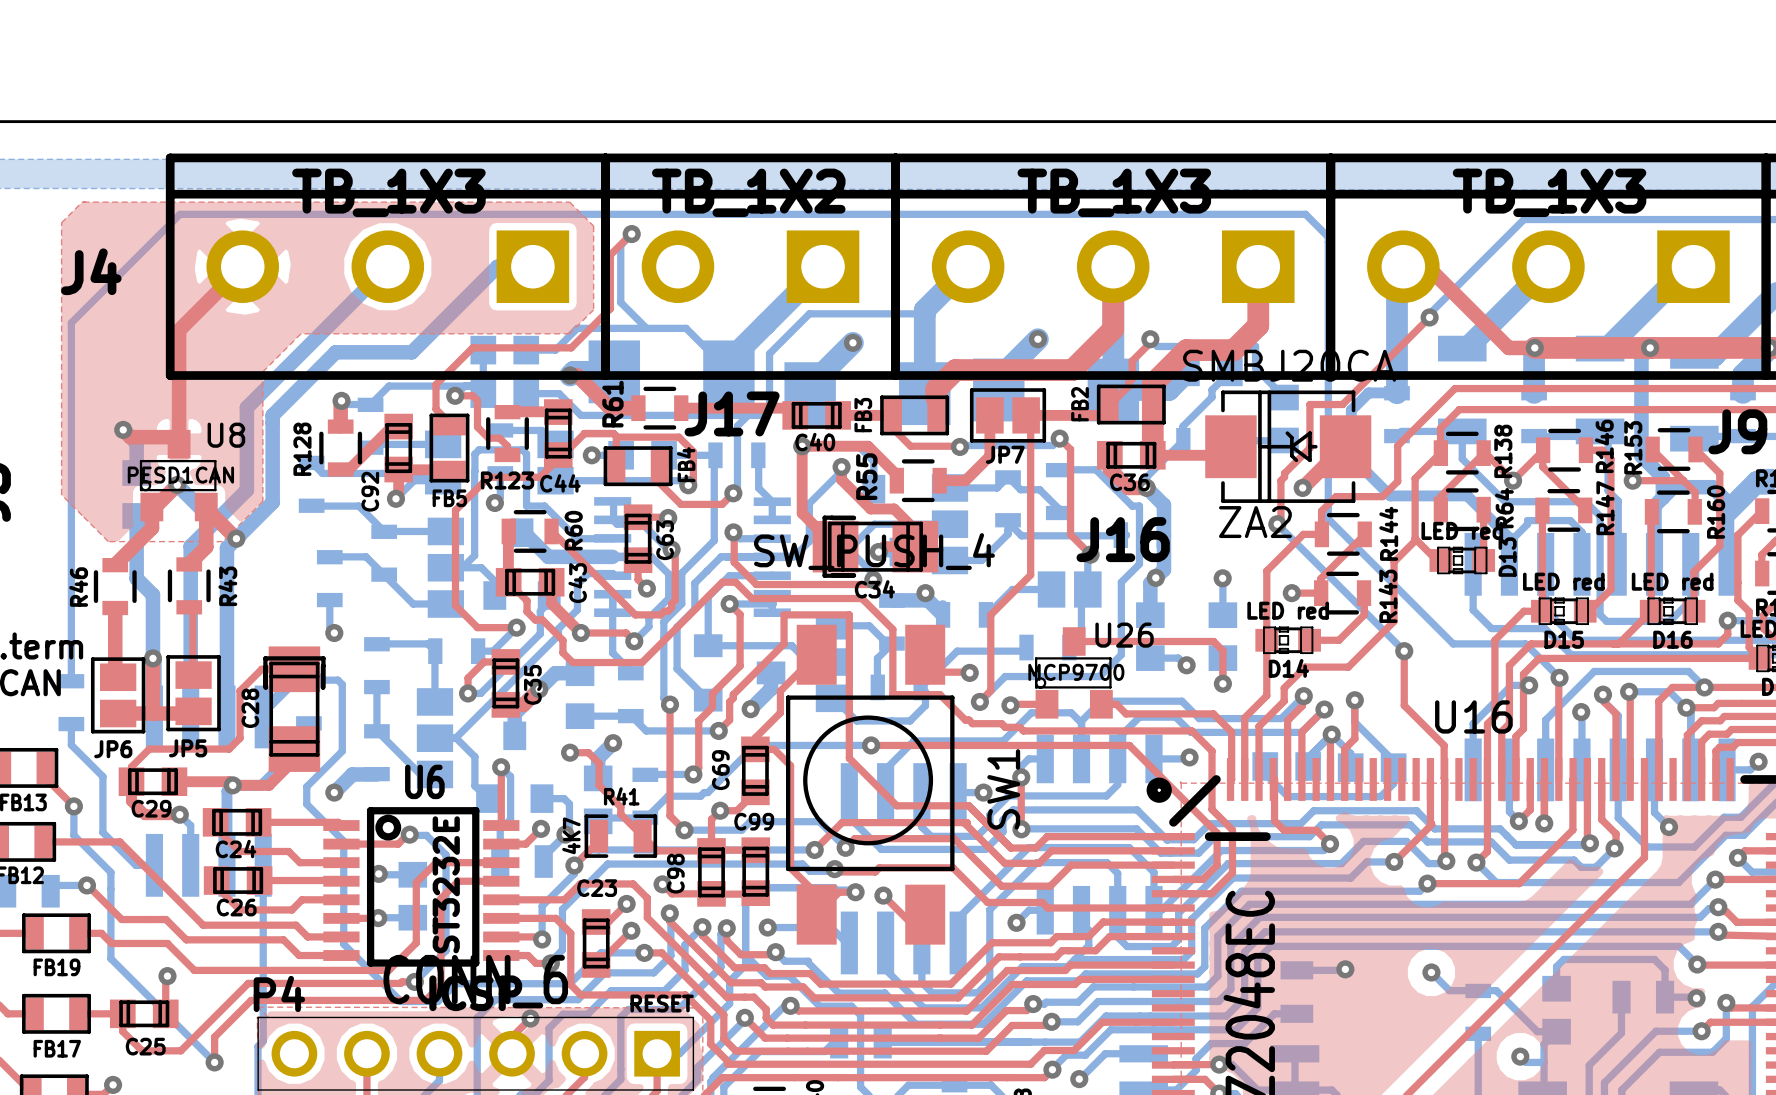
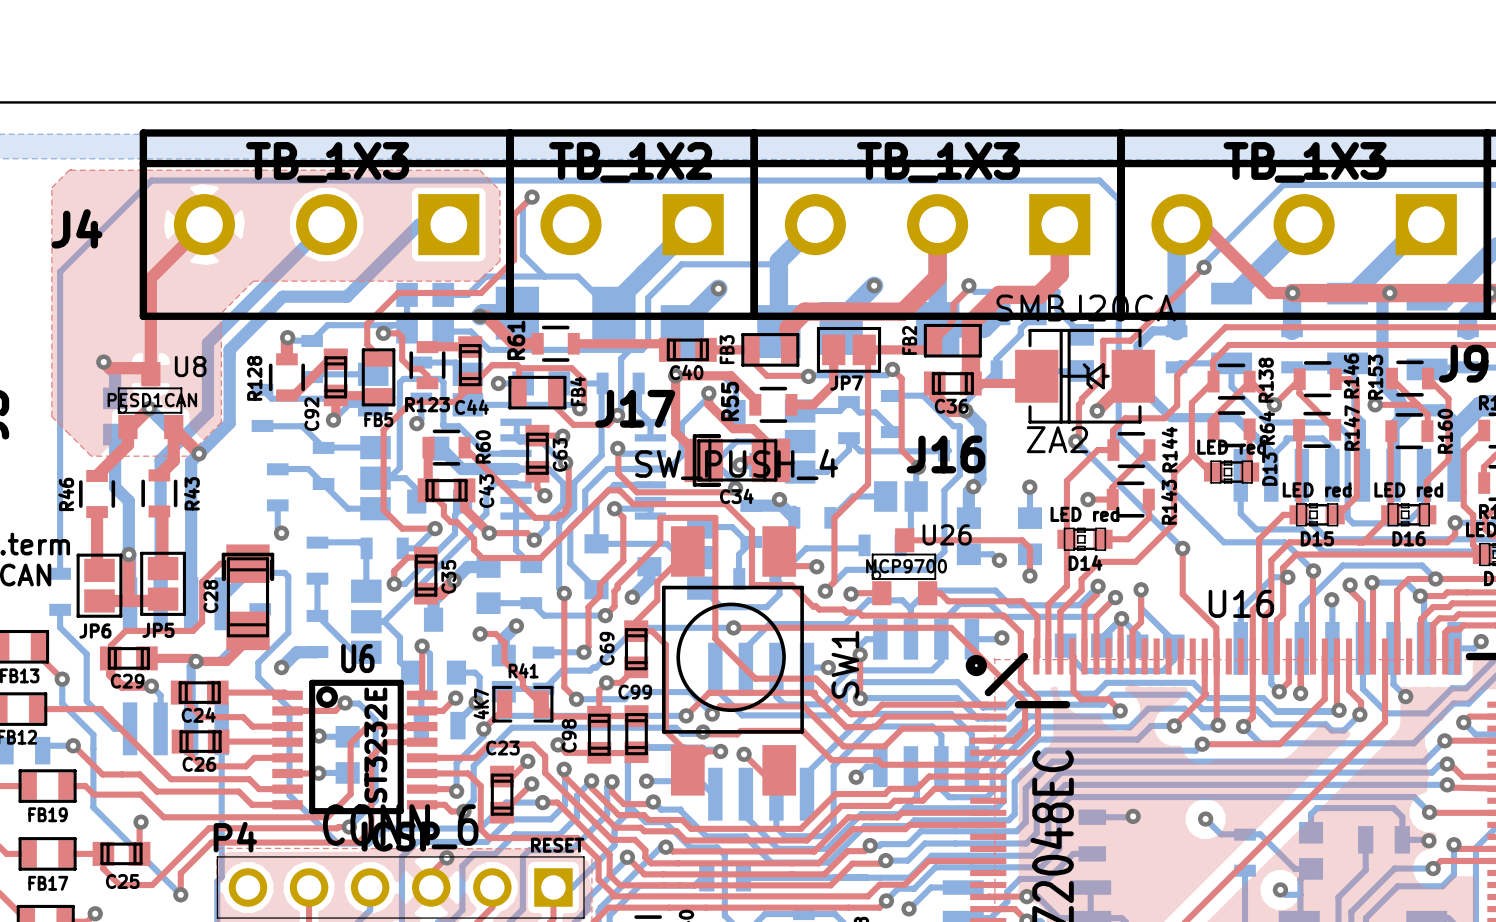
J17 name position: J17 (732, 413) -> J17 (635, 408)
top track width: thin (192, 611) (192, 676) -> thick (162, 514) (162, 569)

